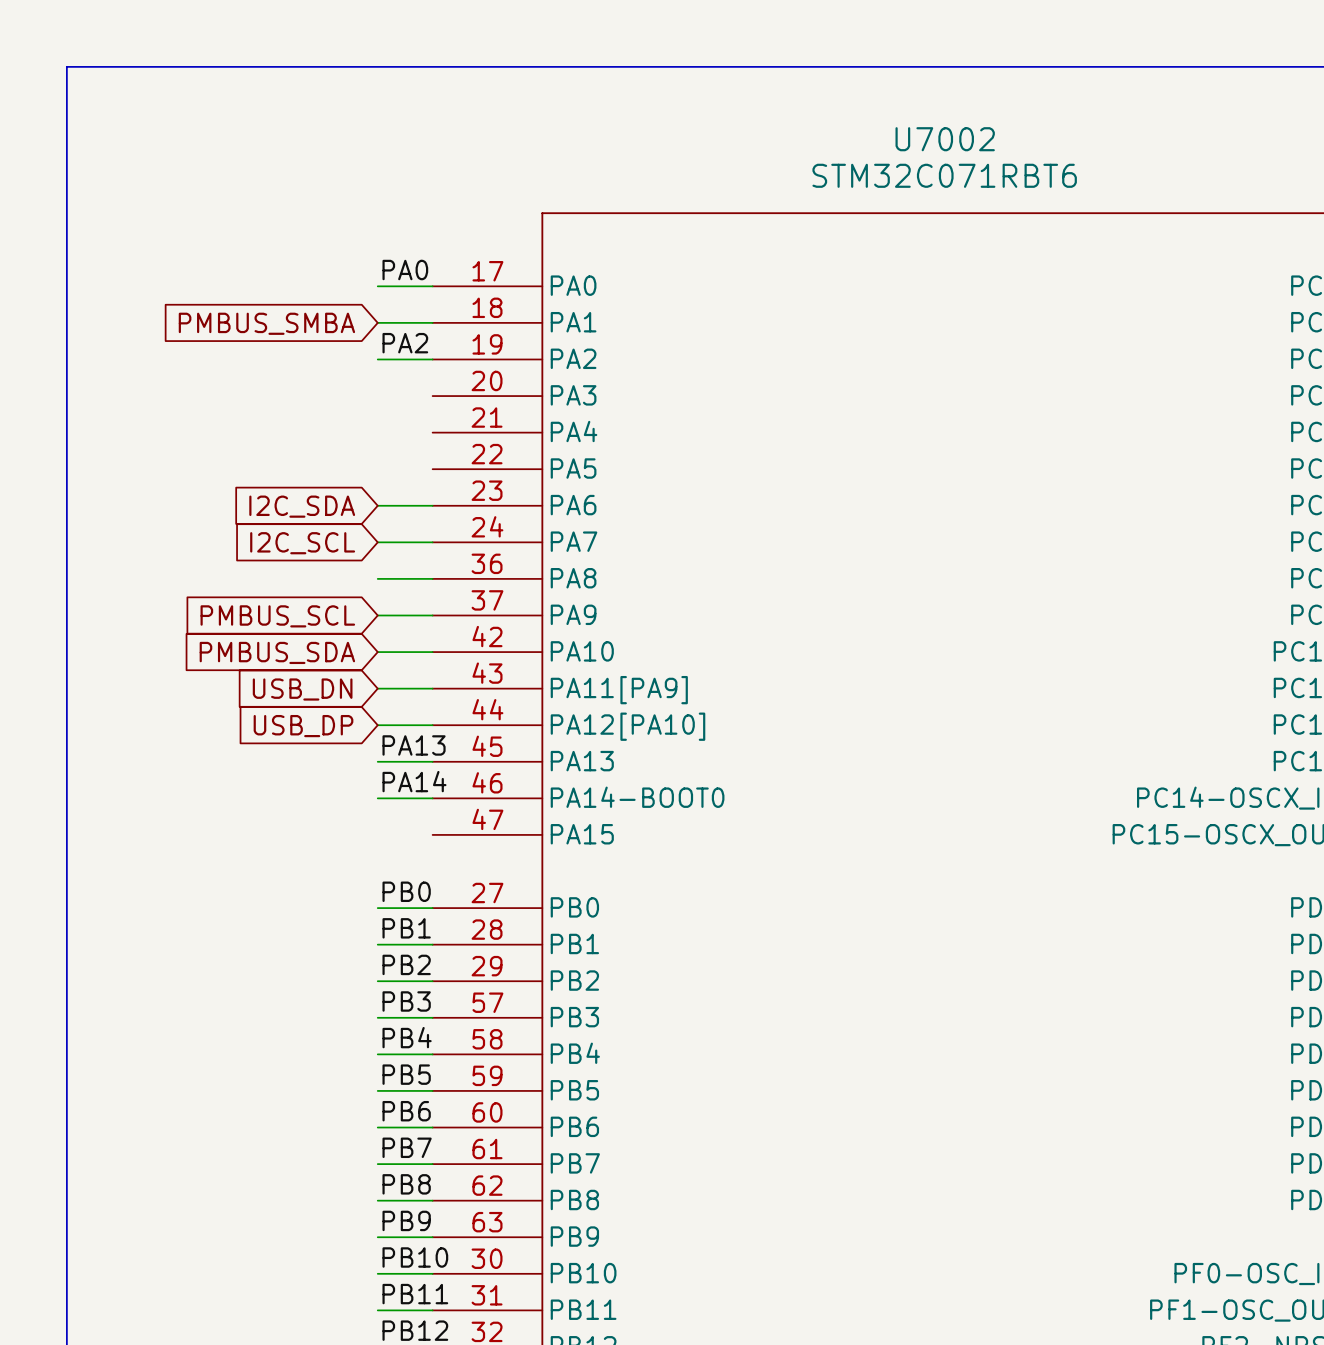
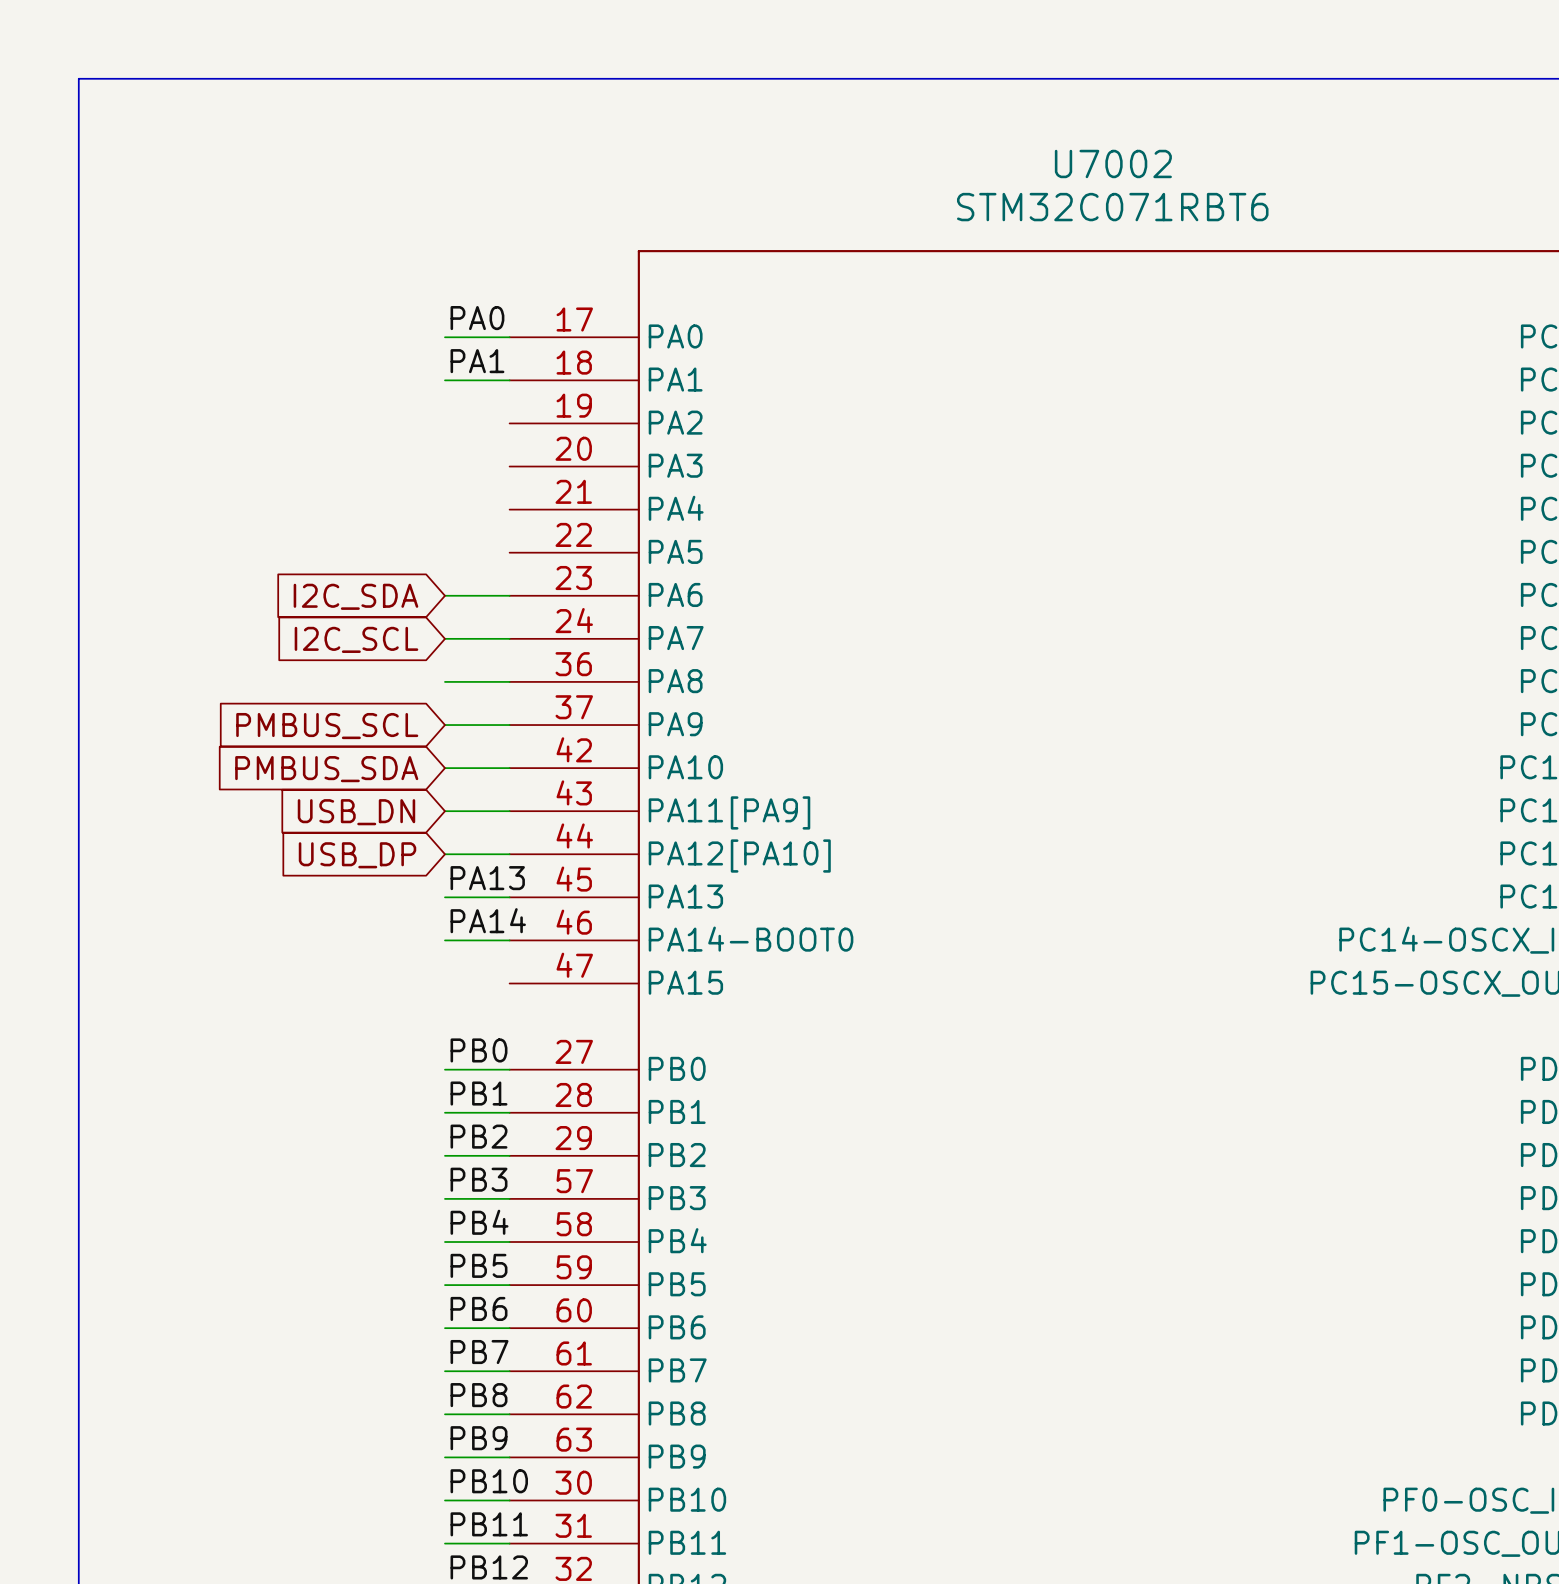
global label: PMBUS_SMBA (266, 323) -> none
label: PA2 (405, 343) -> PA1 (477, 361)
wire: (377, 359) (432, 359) -> none

